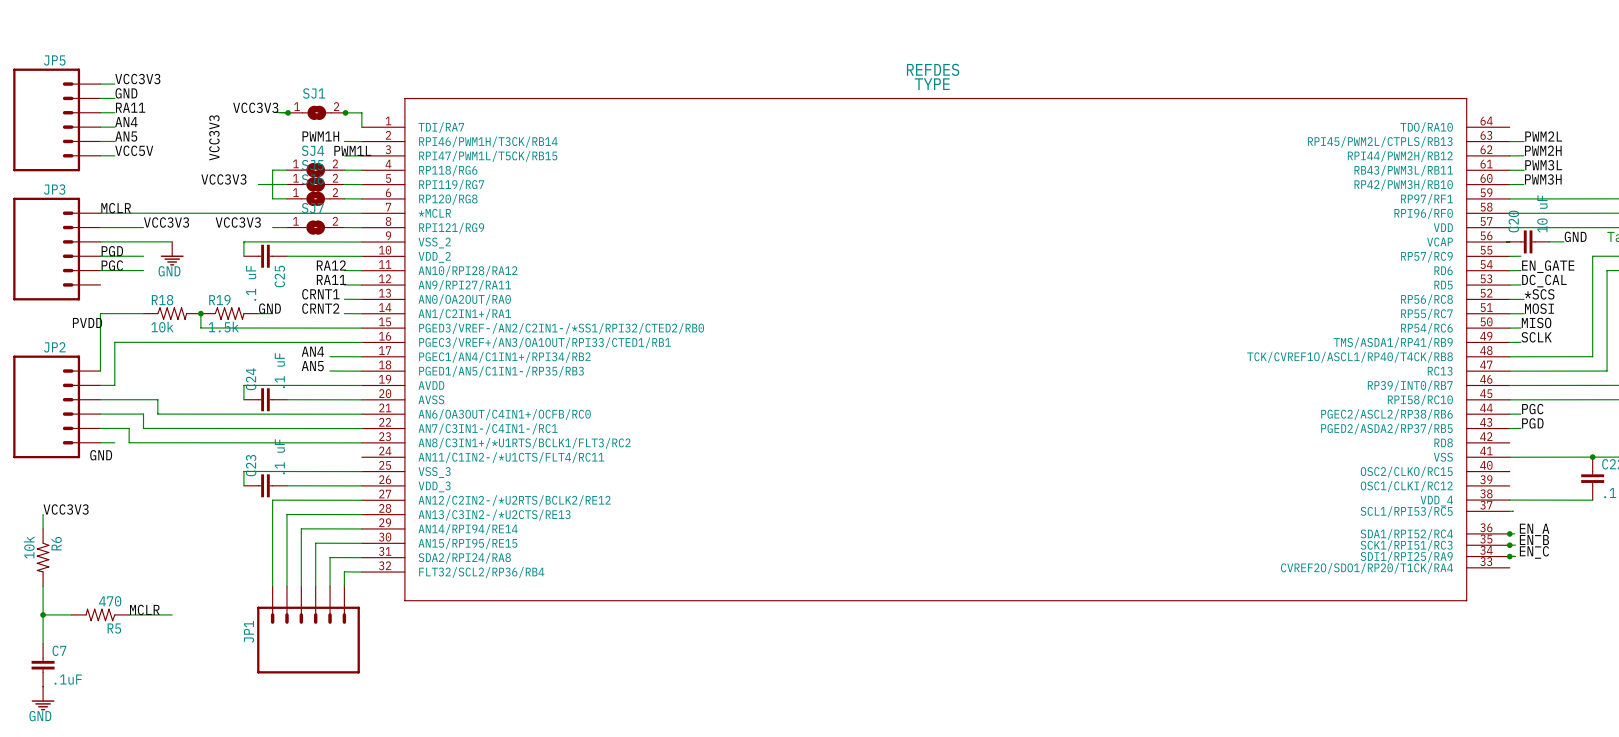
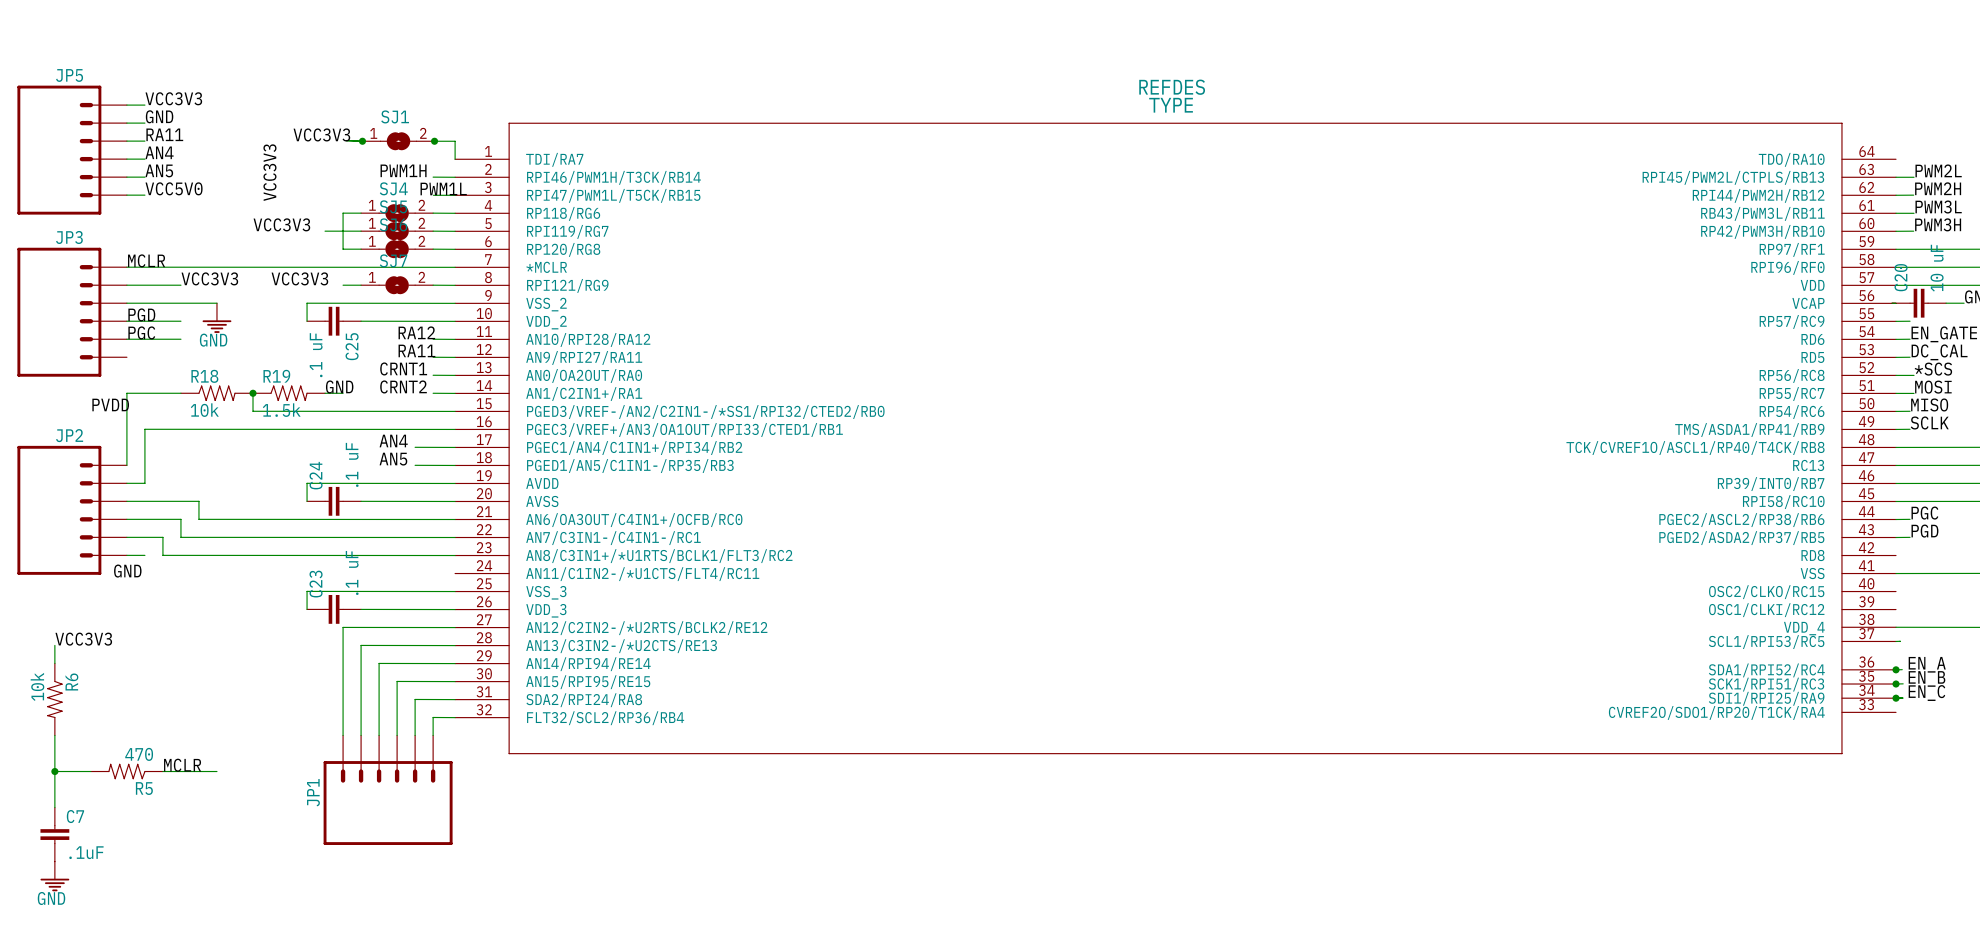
label: VCC5V (134, 150) -> VCC5V0 (174, 188)

